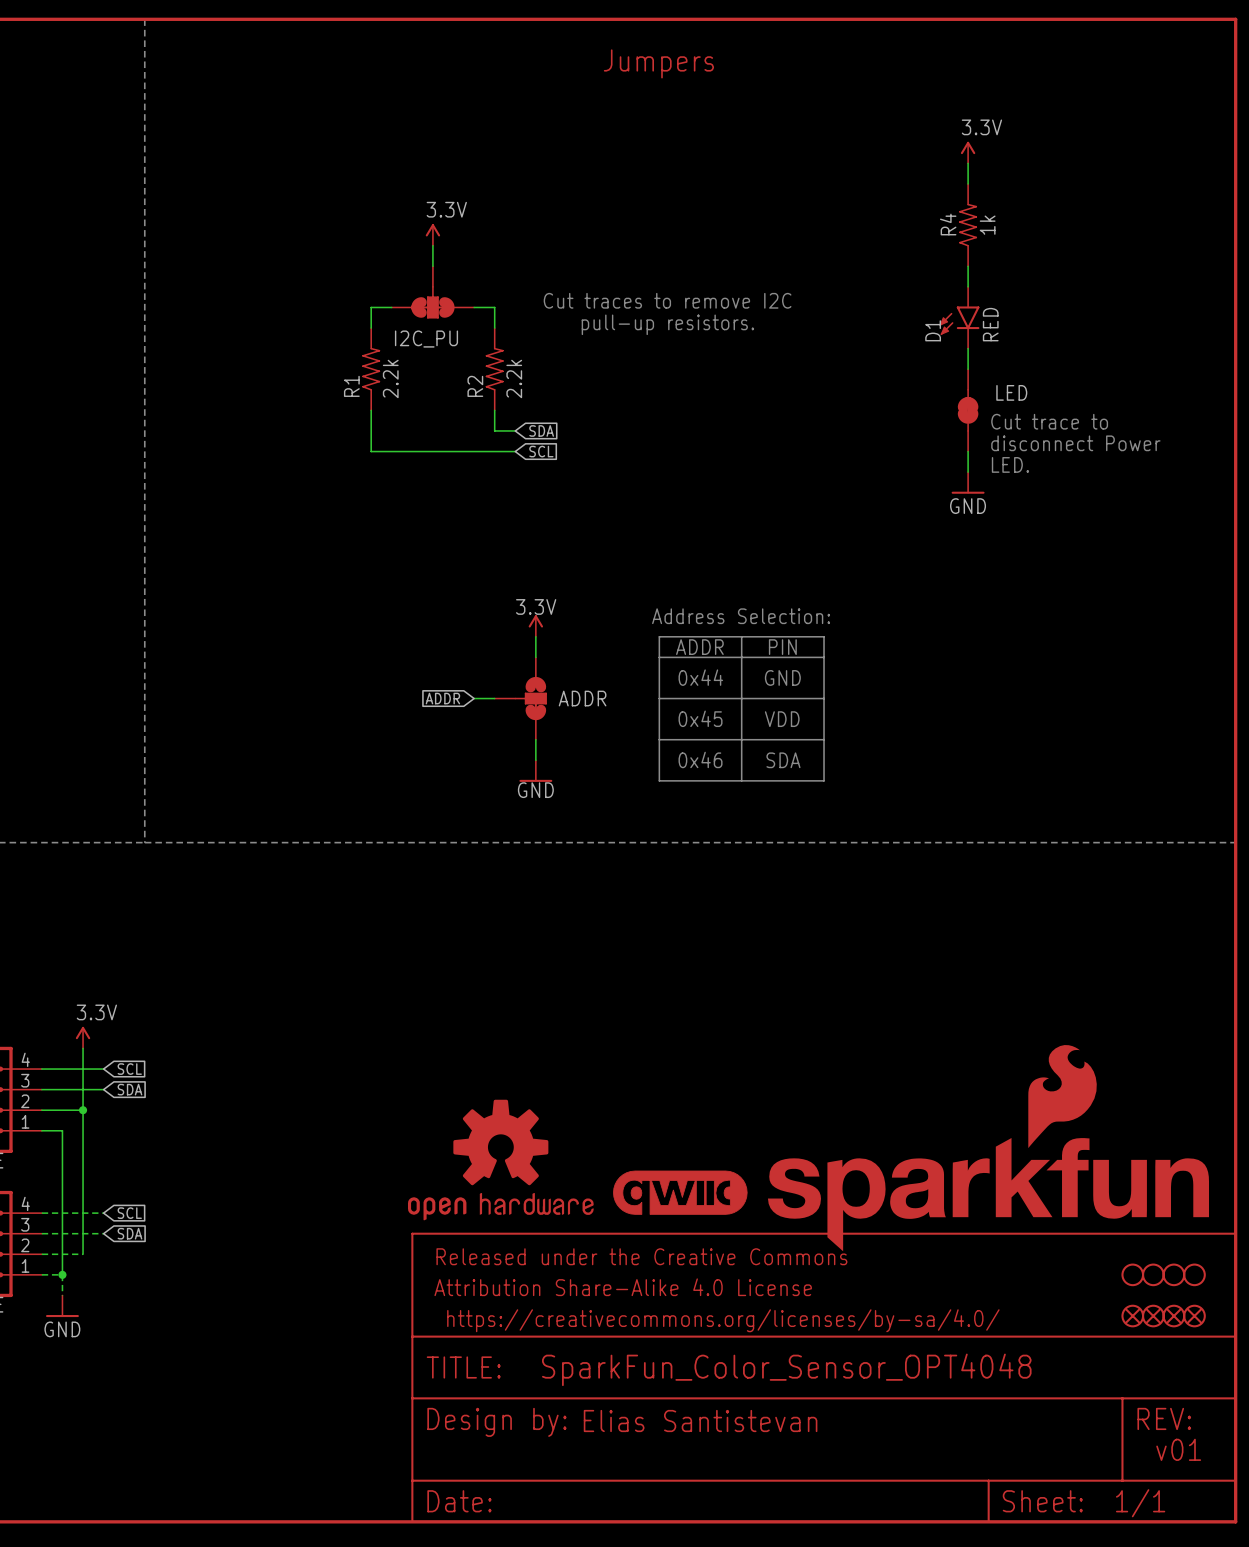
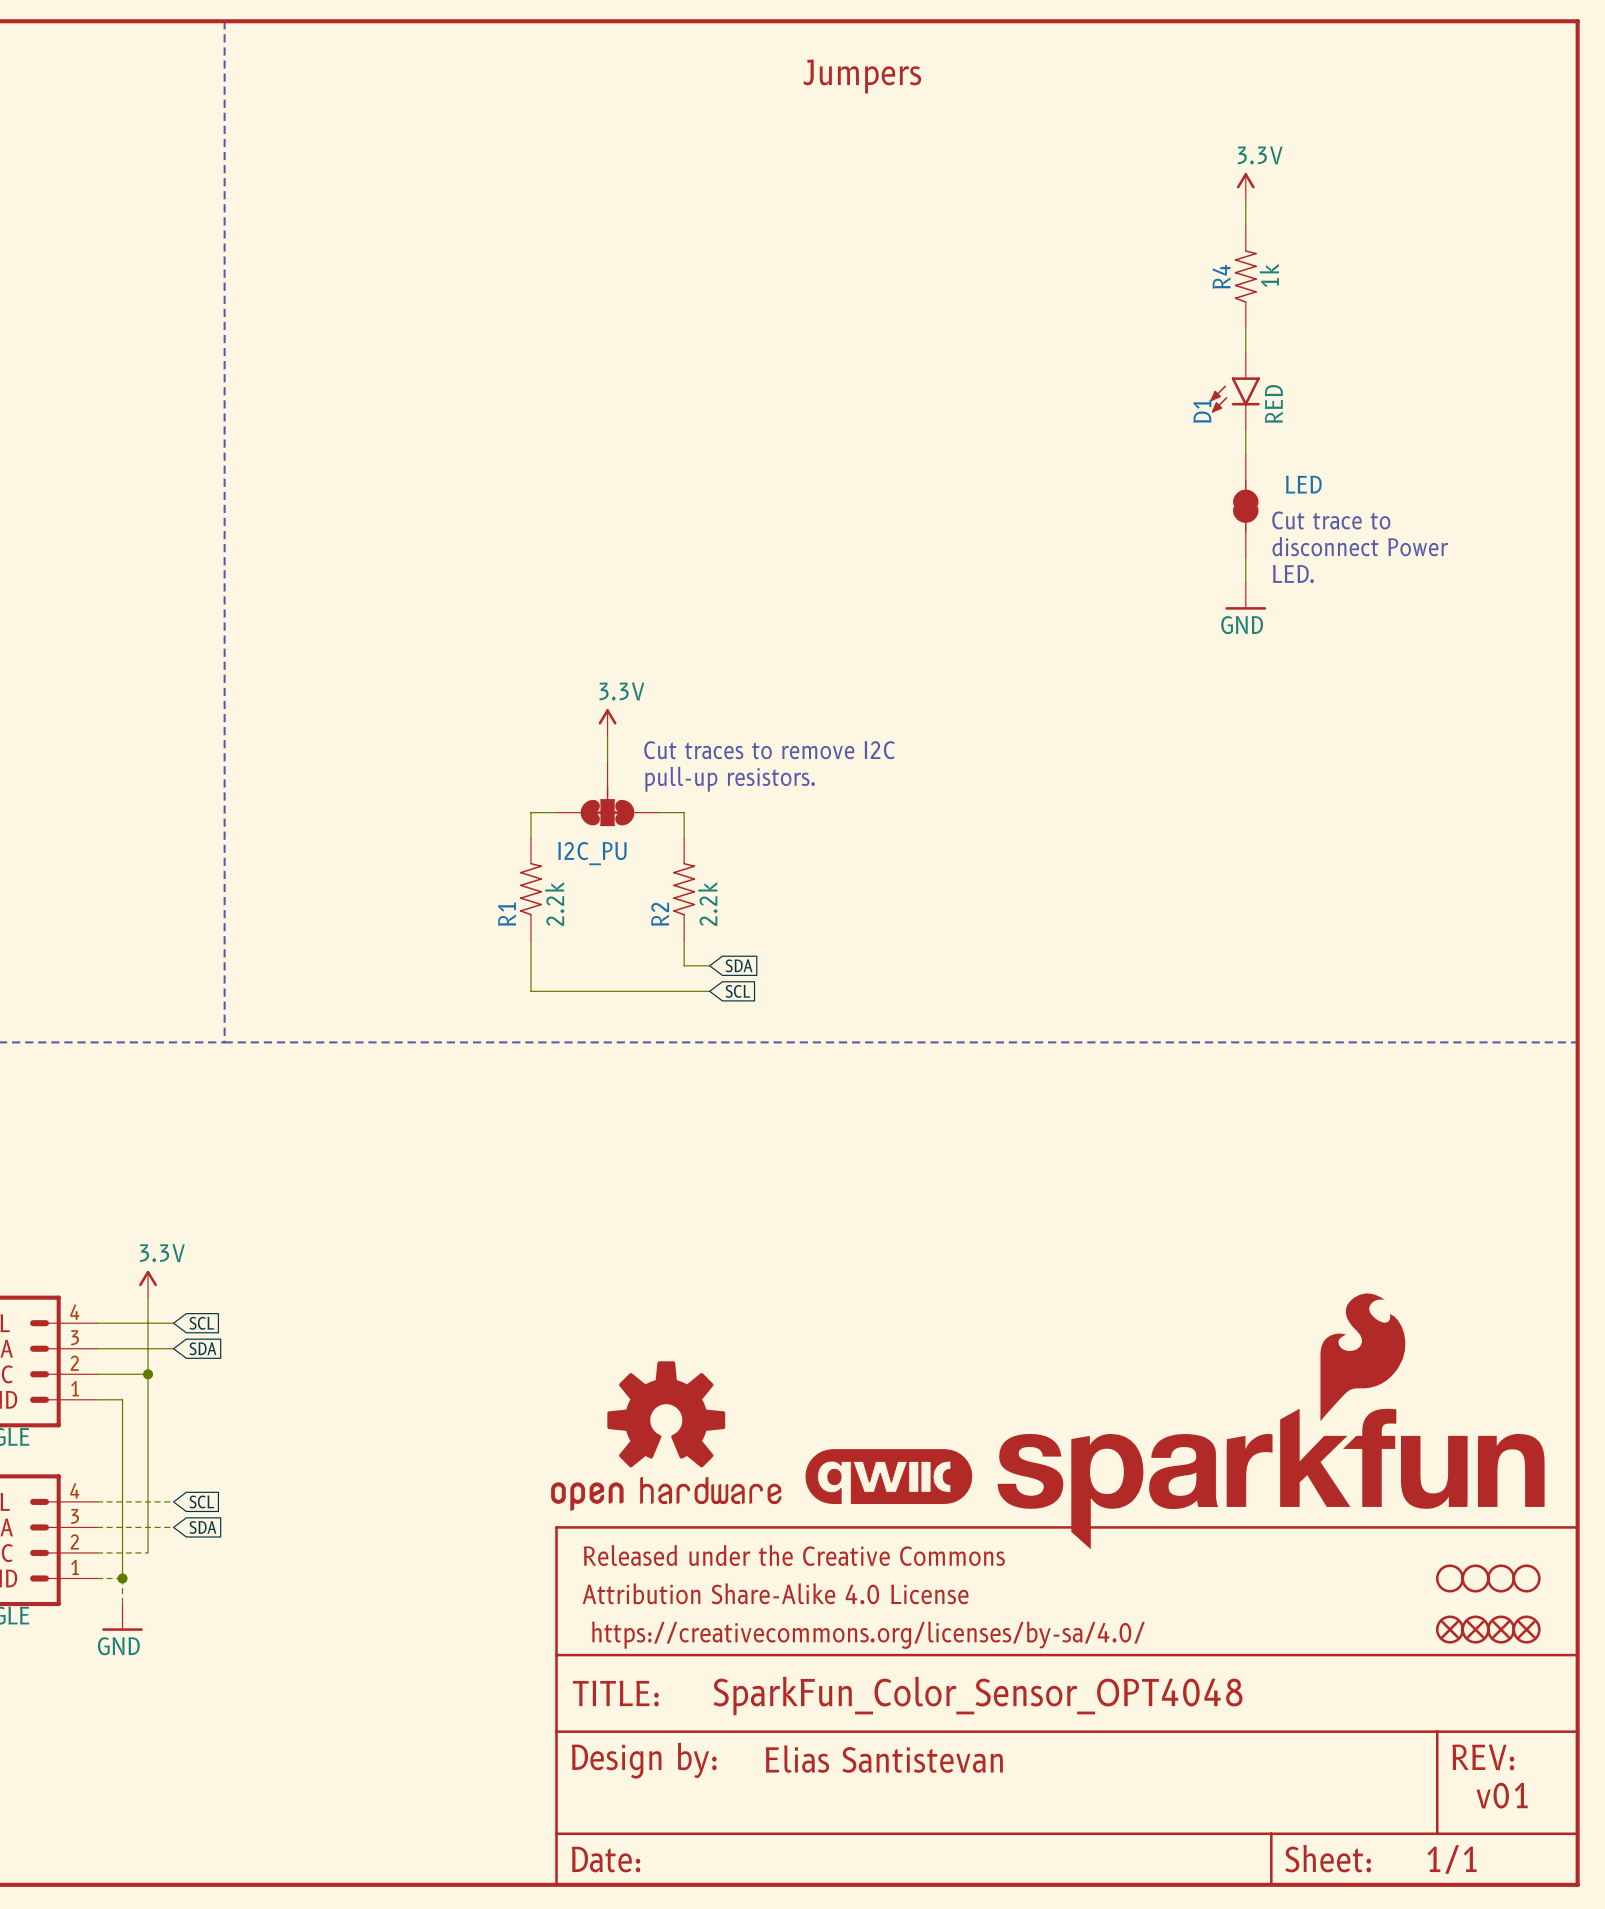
power symbol: 3.3V (432, 234) -> none
wire: (432, 245) (432, 266) -> none
I2C_PU position: (432, 292) -> (607, 793)
text: Cut traces to remove I2C (667, 300) -> none
wire: (391, 307) (371, 307) (371, 328) -> none
wire: (474, 307) (494, 307) (494, 328) -> none
text: pull-up resistors. (667, 324) -> none
R1 position: (371, 369) -> (530, 889)
R2 position: (494, 369) -> (684, 889)
wire: (371, 410) (371, 451) (515, 451) -> none
wire: (494, 410) (494, 430) (515, 430) -> none
global label: SDA (541, 430) -> none
global label: SCL (541, 451) -> none
power symbol text position: 3.3V (536, 606) -> 3.3V (621, 691)
text: none -> Cut traces to remove I2C (769, 750)
text: Address Selection: (741, 616) -> none
power symbol position: 3.3V (535, 625) -> 3.3V (607, 722)
text: none -> pull-up resistors. (730, 779)
wire: (535, 636) (535, 657) -> (607, 736) (607, 761)
line: (659, 636) (659, 780) (824, 780) (824, 636) (659, 636) -> none
line: (741, 636) (741, 780) -> none
text: ADDR (699, 647) -> none
text: PIN (782, 647) -> none
wire: none -> (556, 812) (530, 812) (530, 838)
wire: none -> (658, 812) (684, 812) (684, 838)
line: (659, 657) (824, 657) -> none
text: 0x44 (700, 677) -> none
text: GND (782, 677) -> none
global label: ADDR (442, 698) -> none
wire: (474, 698) (494, 698) -> none
ADDR: (520, 698) -> none
line: (659, 698) (824, 698) -> none
text: 0x45 (700, 718) -> none
text: VDD (782, 719) -> none
wire: (535, 739) (535, 760) -> none
line: (659, 739) (824, 739) -> none
text: 0x46 (700, 759) -> none
wire: none -> (530, 940) (530, 991) (709, 991)
wire: none -> (684, 940) (684, 965) (709, 965)
text: SDA (783, 760) -> none
power symbol: GND (535, 771) -> none
global label: none -> SDA (739, 965)
global label: none -> SCL (737, 991)

